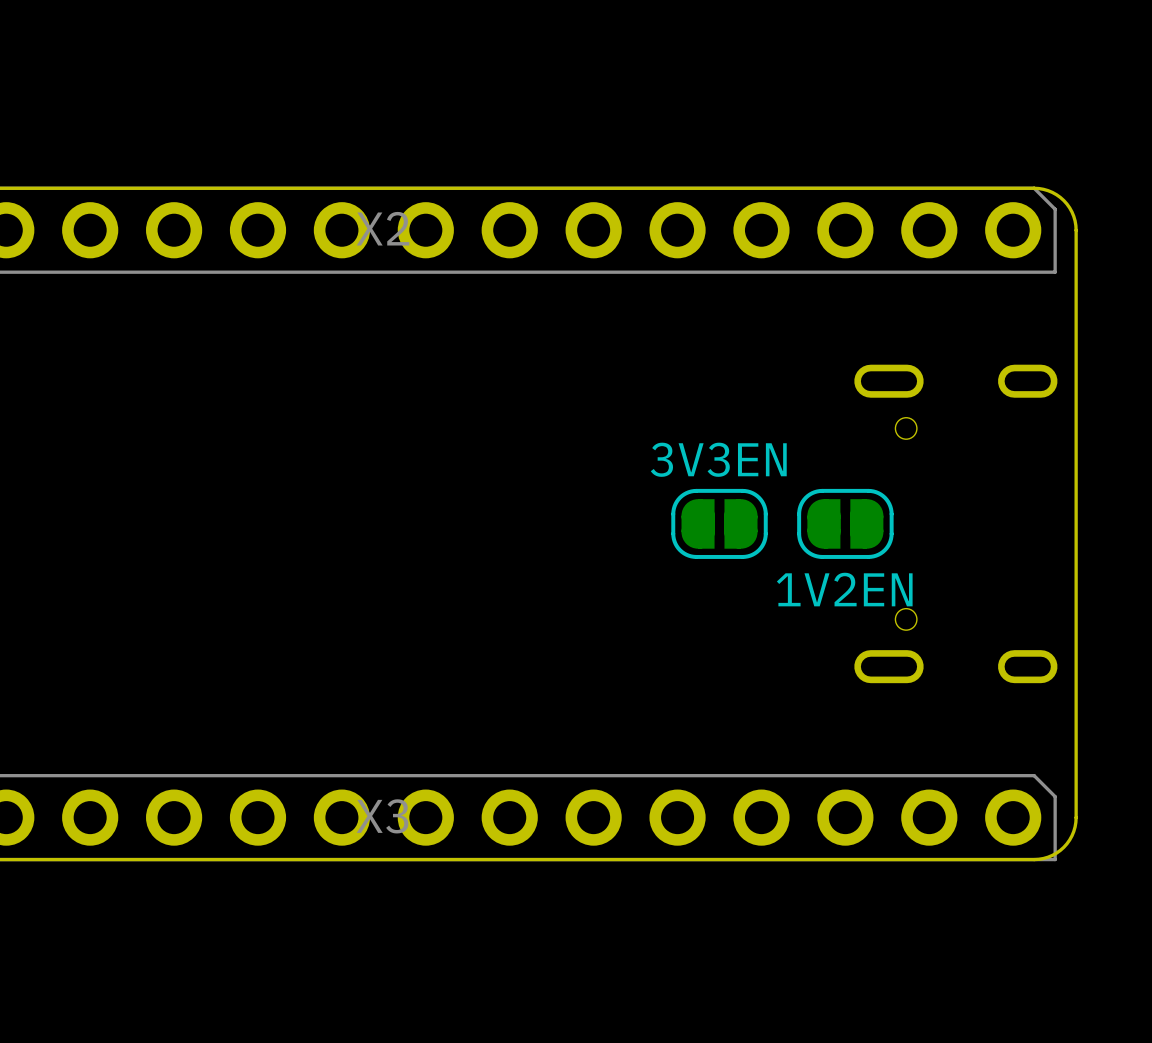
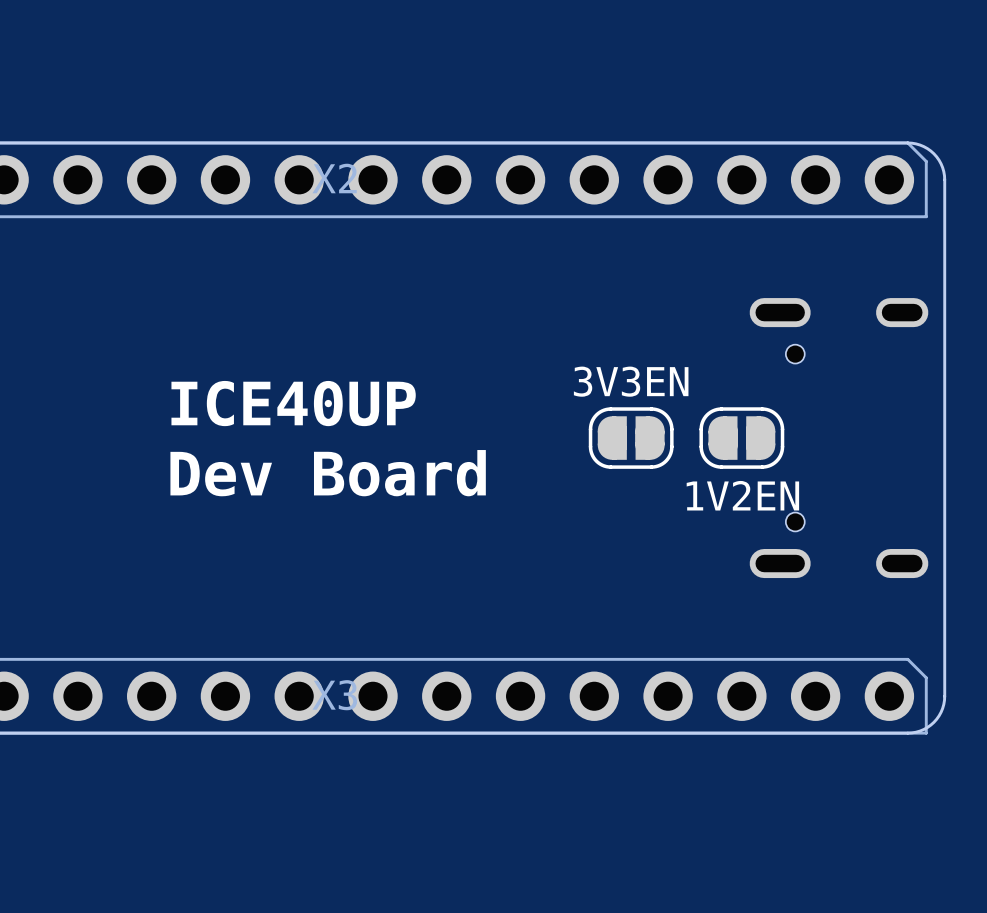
text: none -> ICE40UP (293, 403)
text: none -> Dev Board (328, 473)

